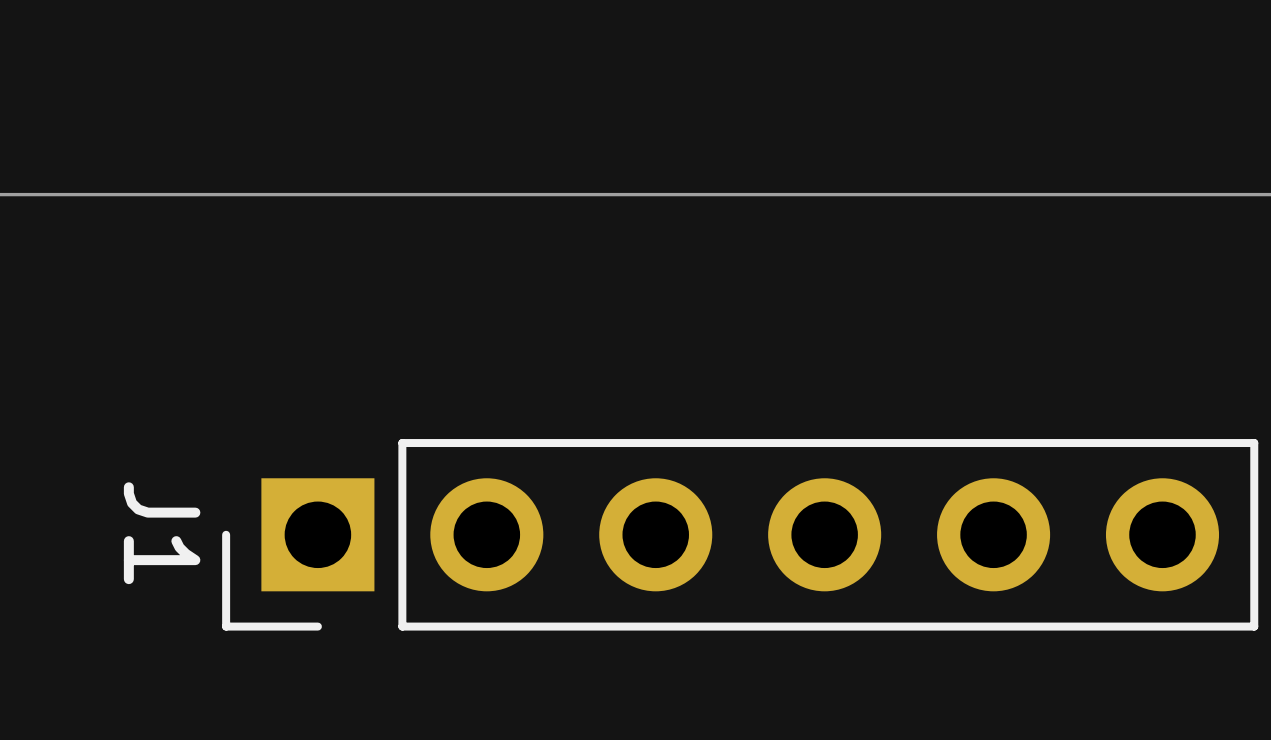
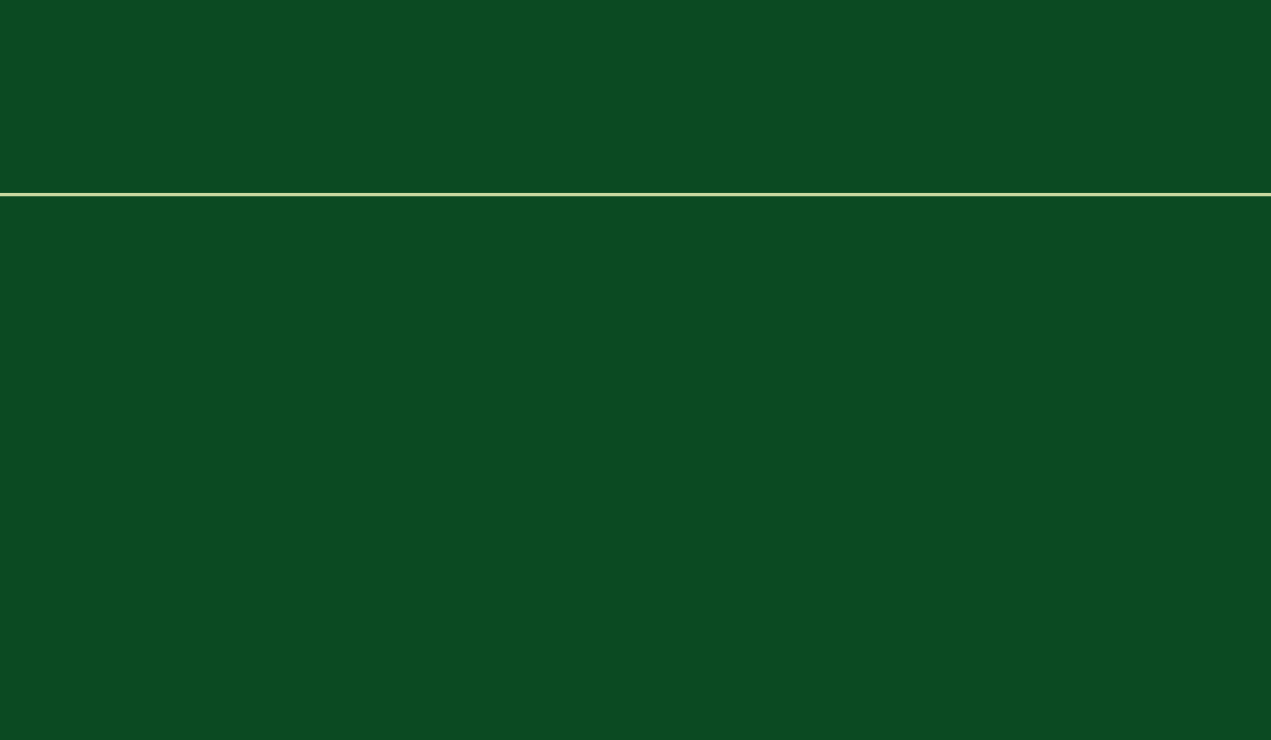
J1: (740, 534) -> none

